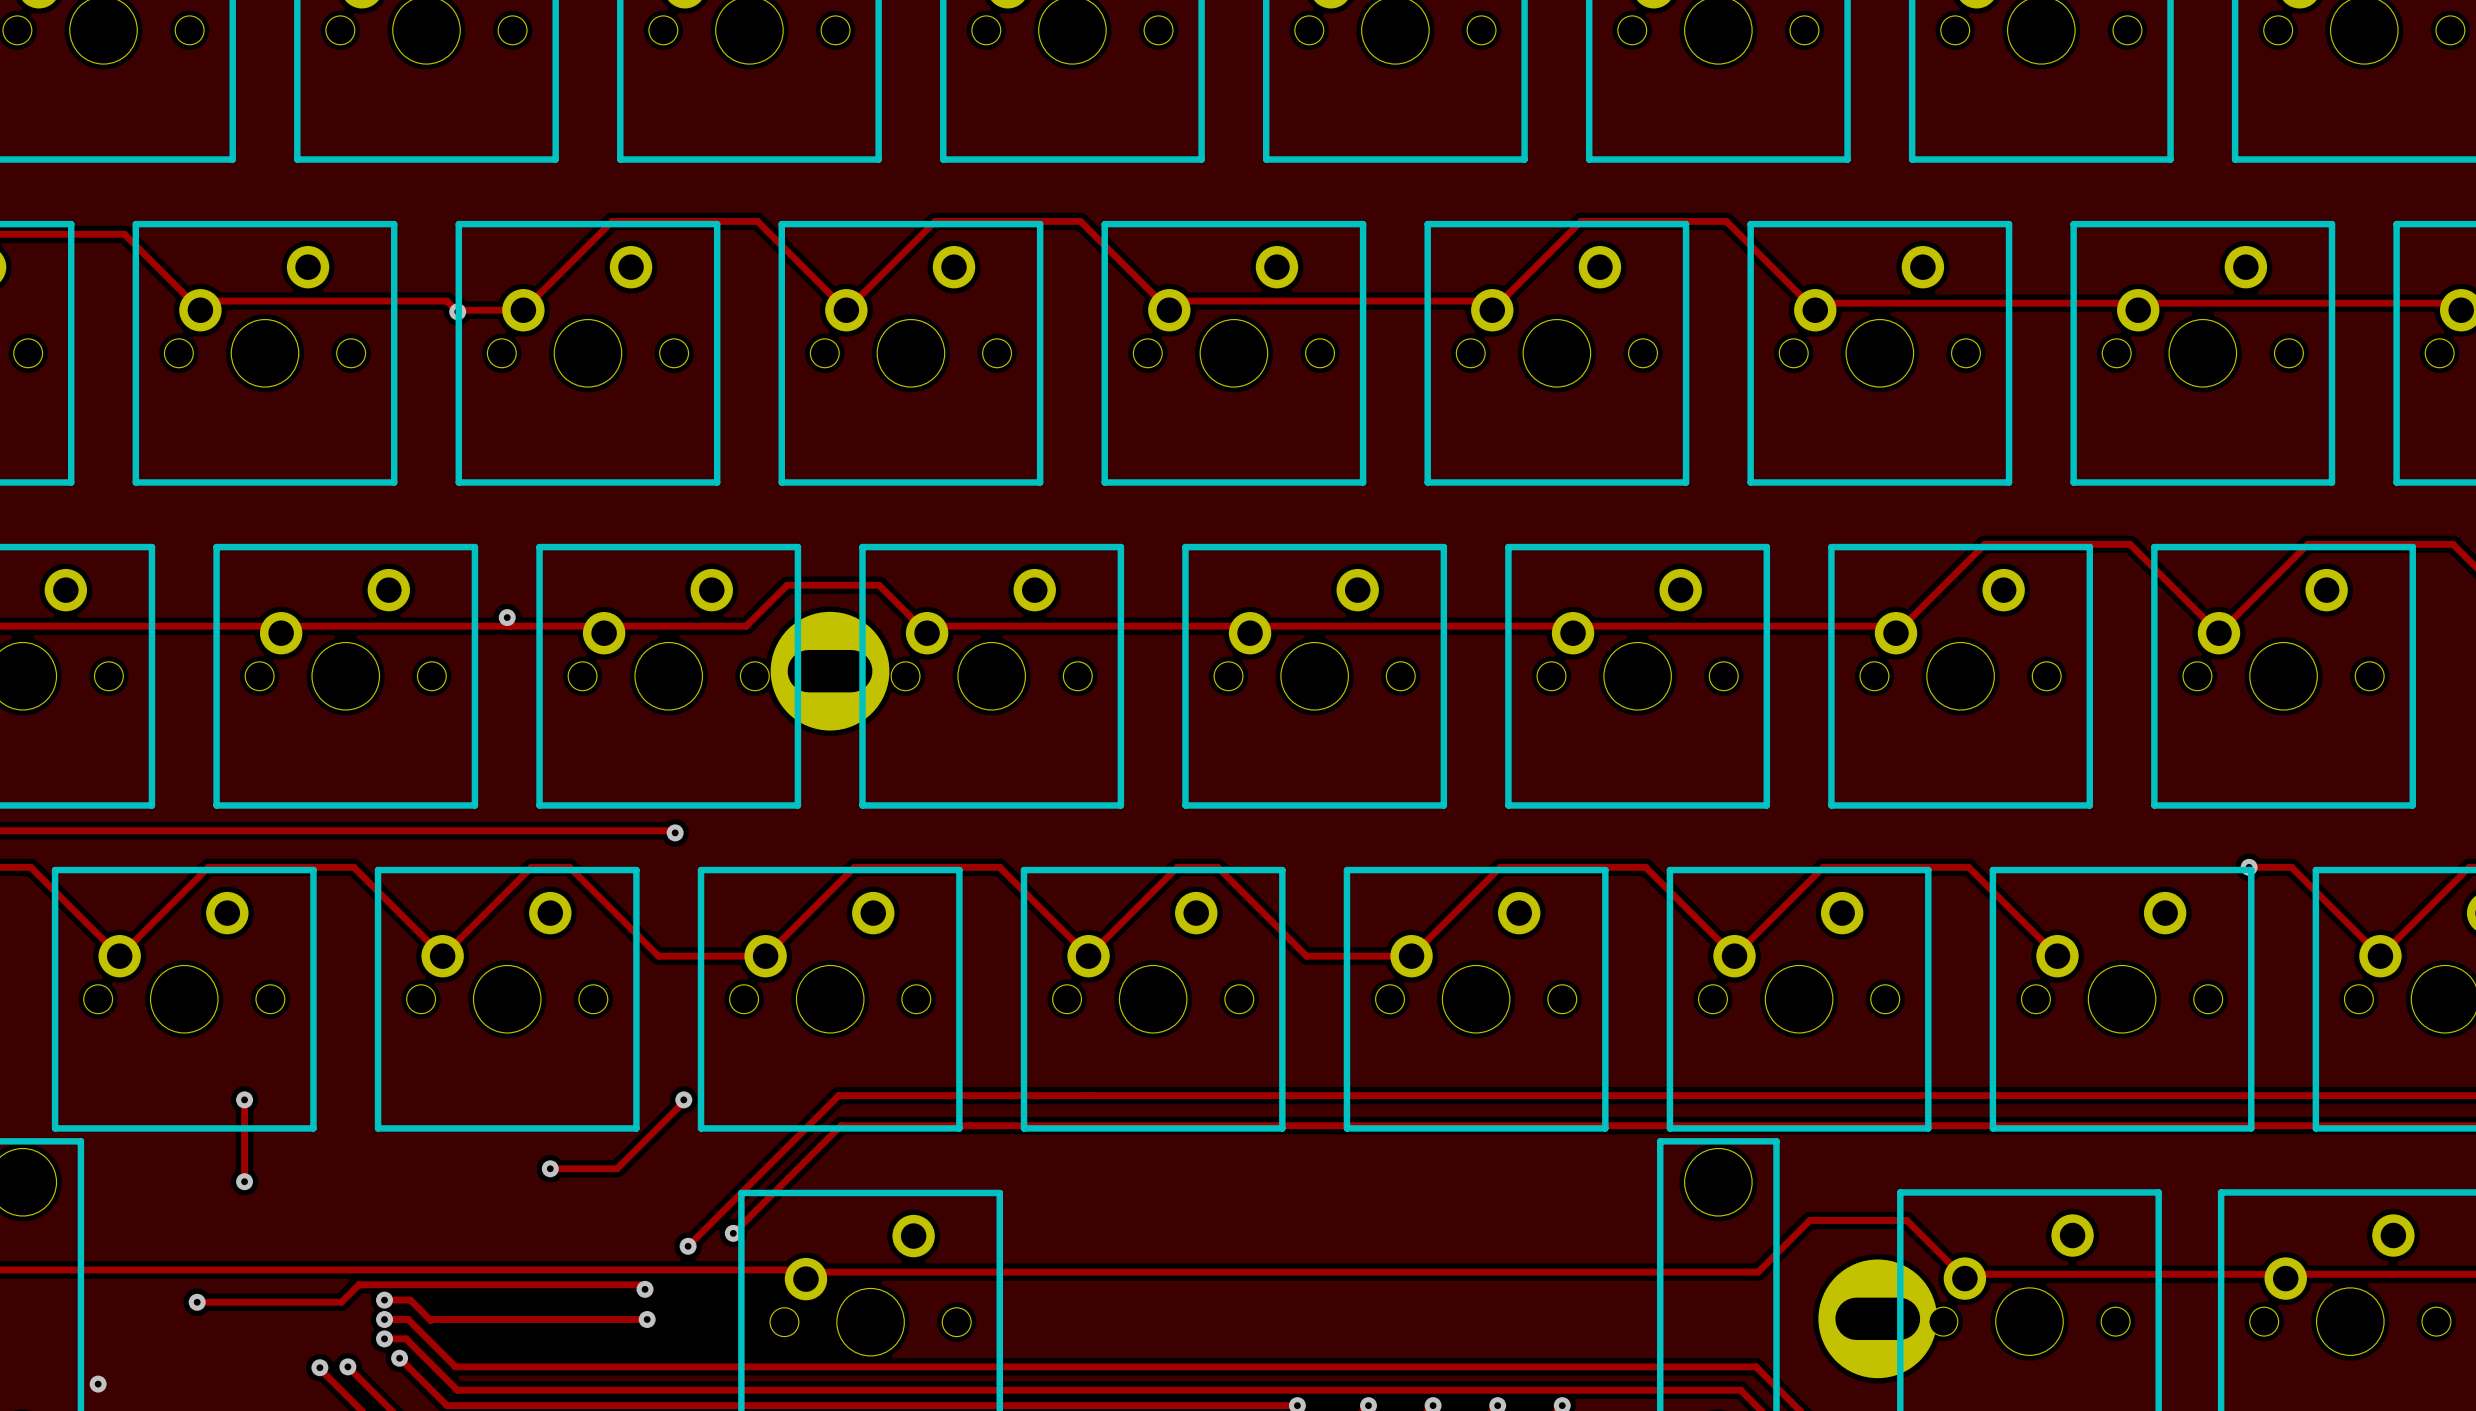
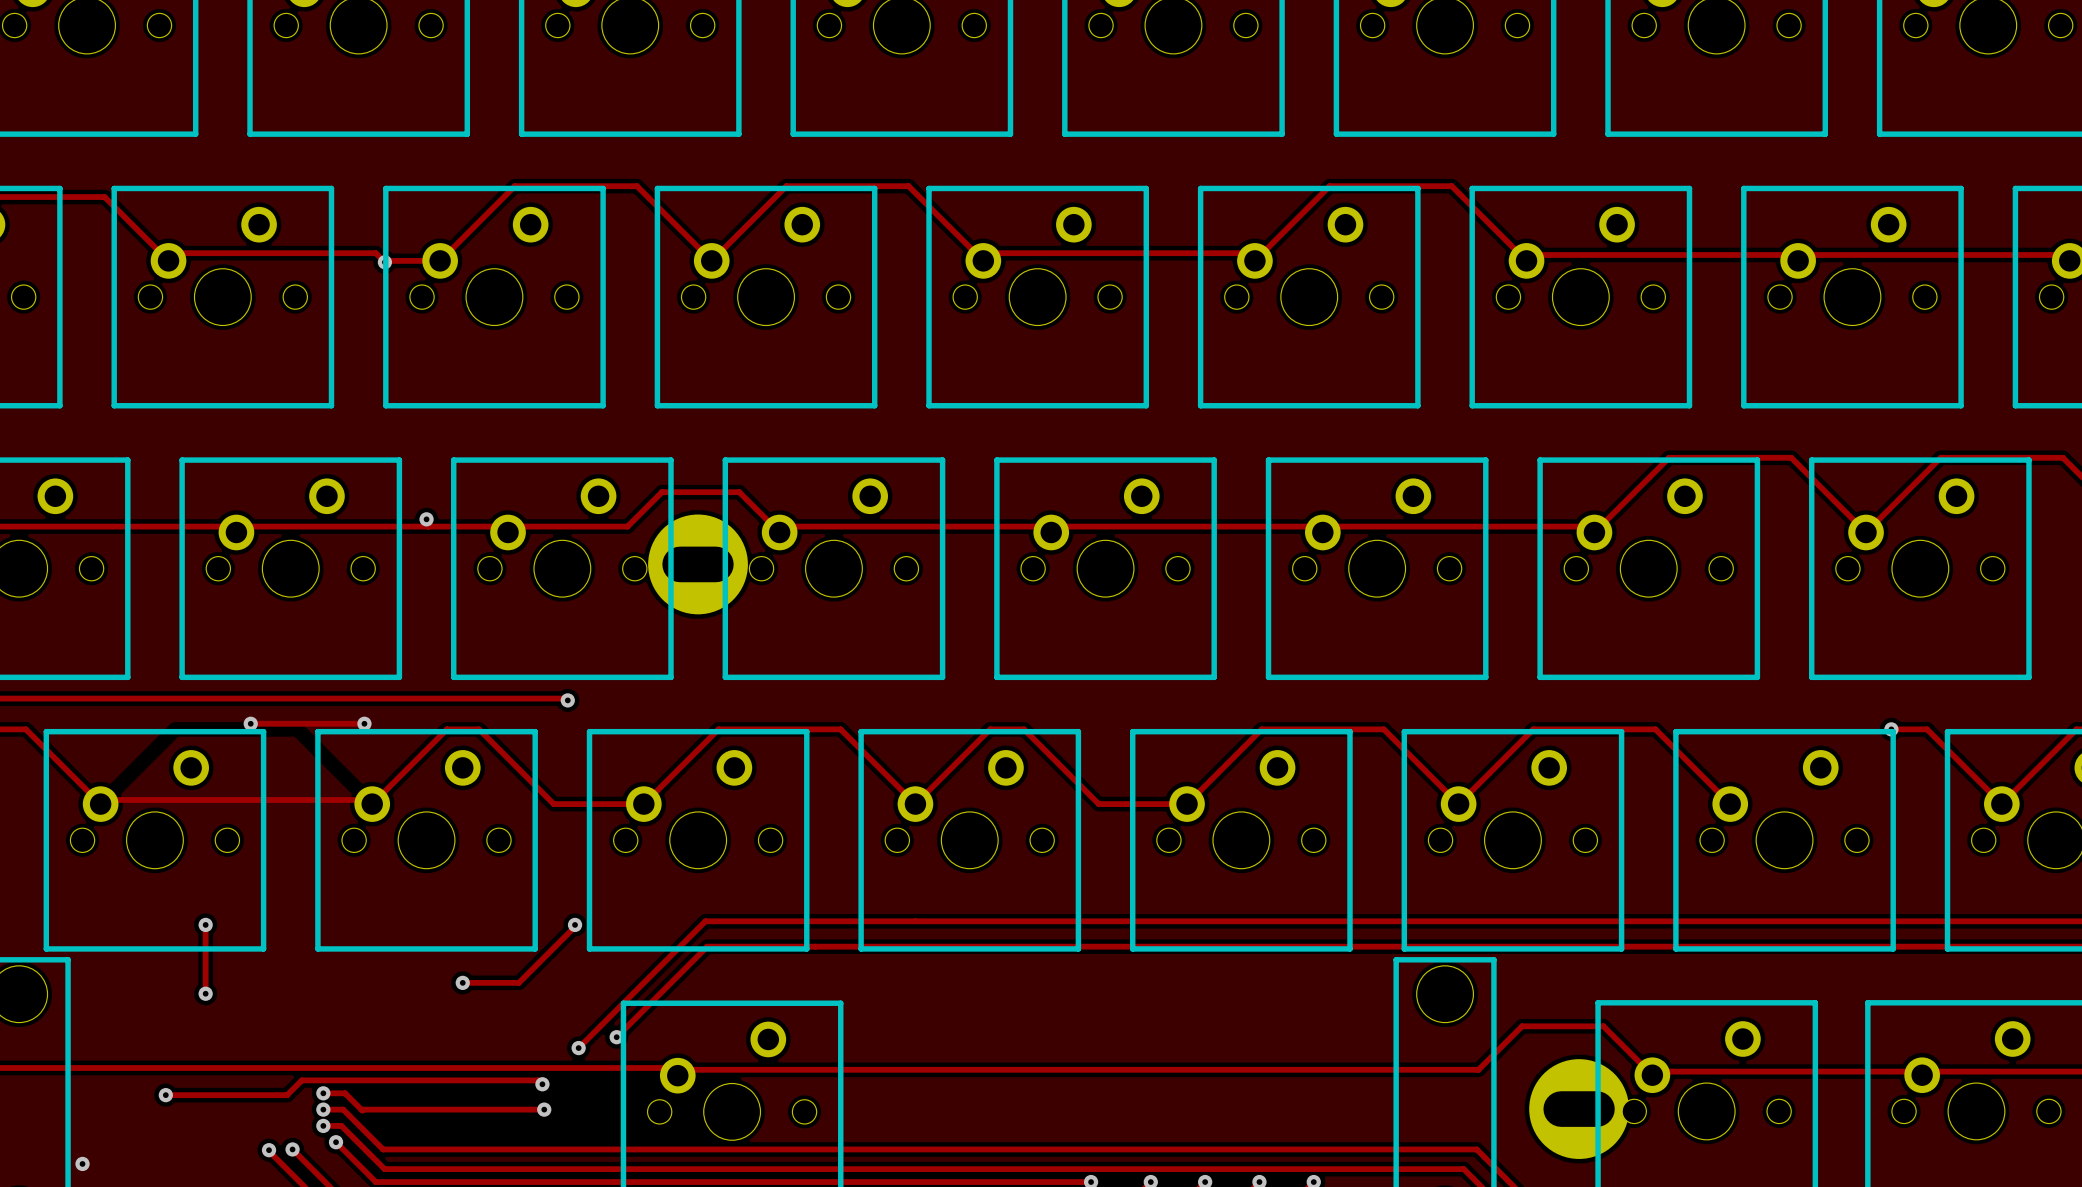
track: none -> (250, 723) (364, 723)
via: none -> (250, 723)
via: none -> (364, 723)
track: (124, 951) (208, 867) (353, 867) (437, 951) -> (104, 800) (368, 800)

